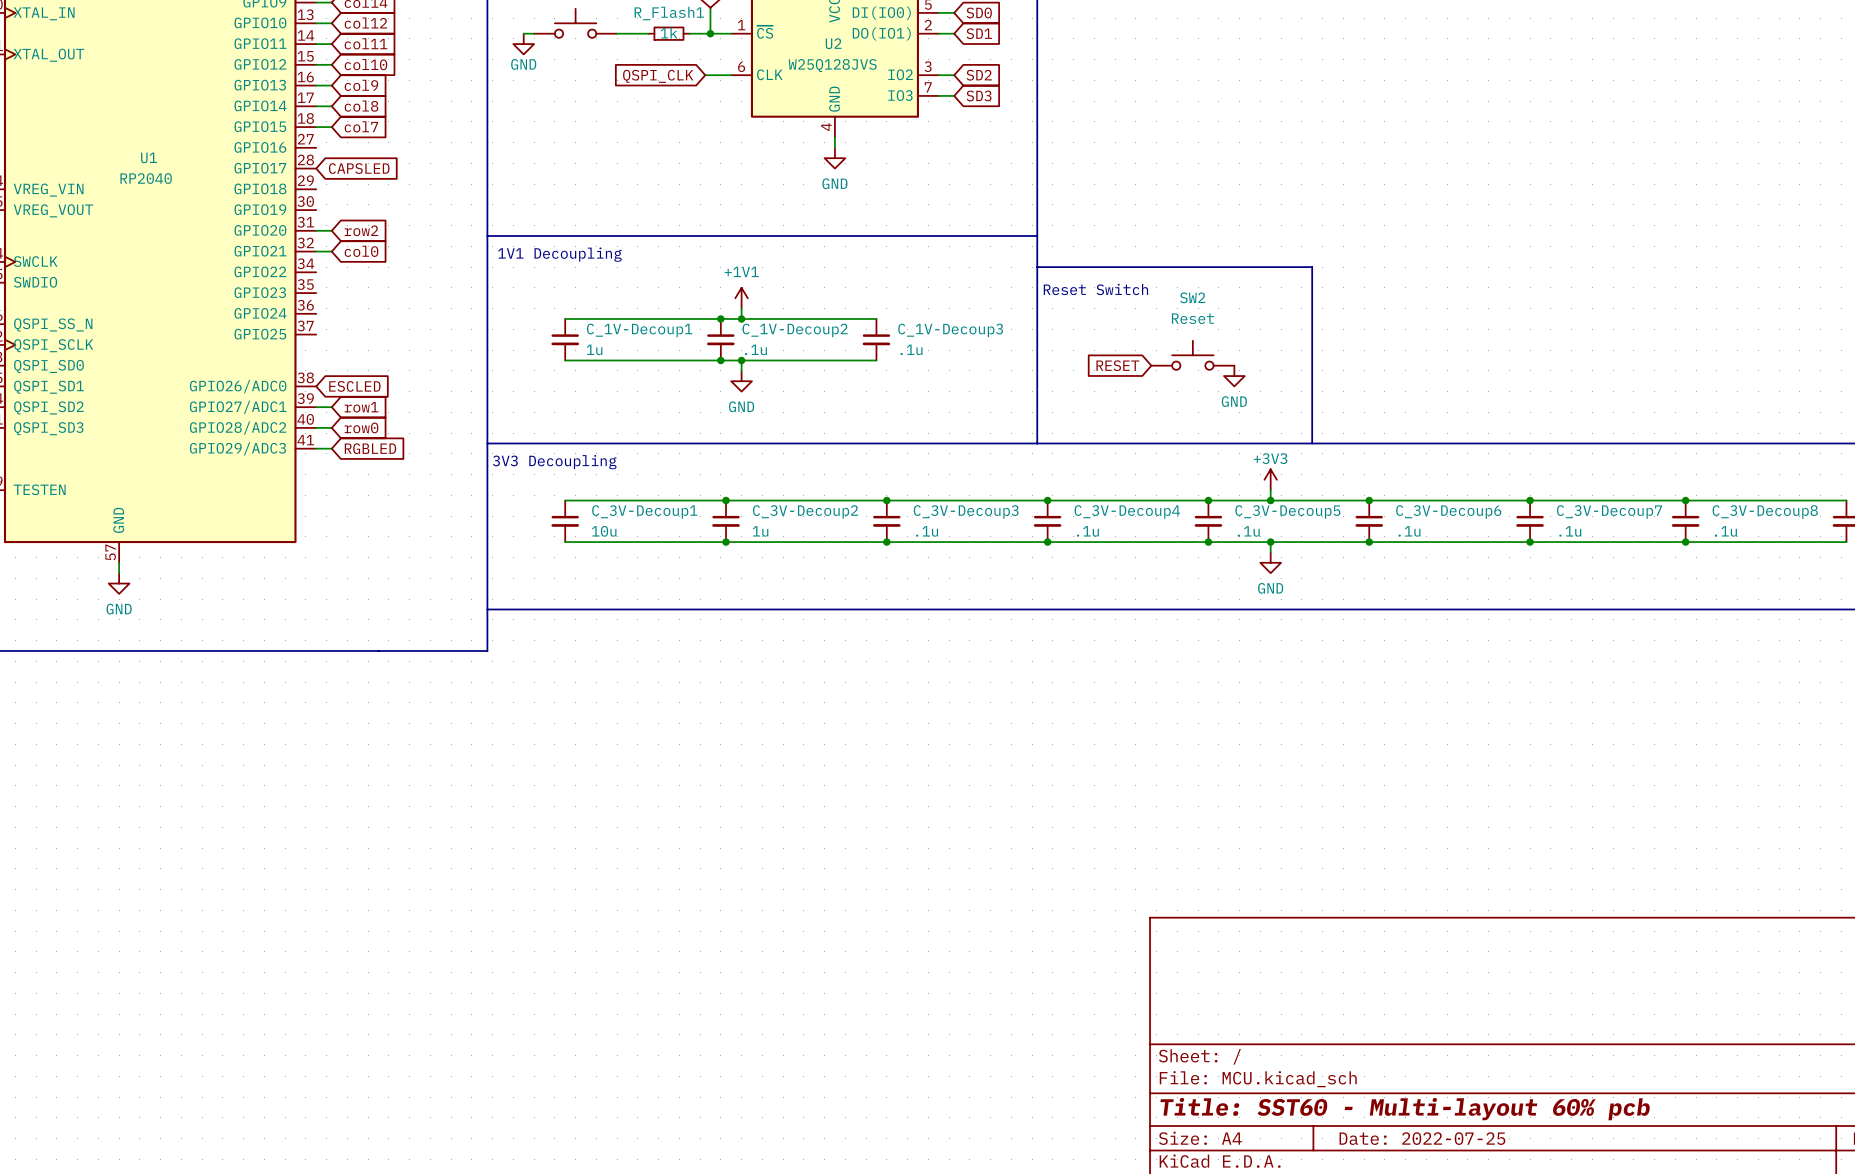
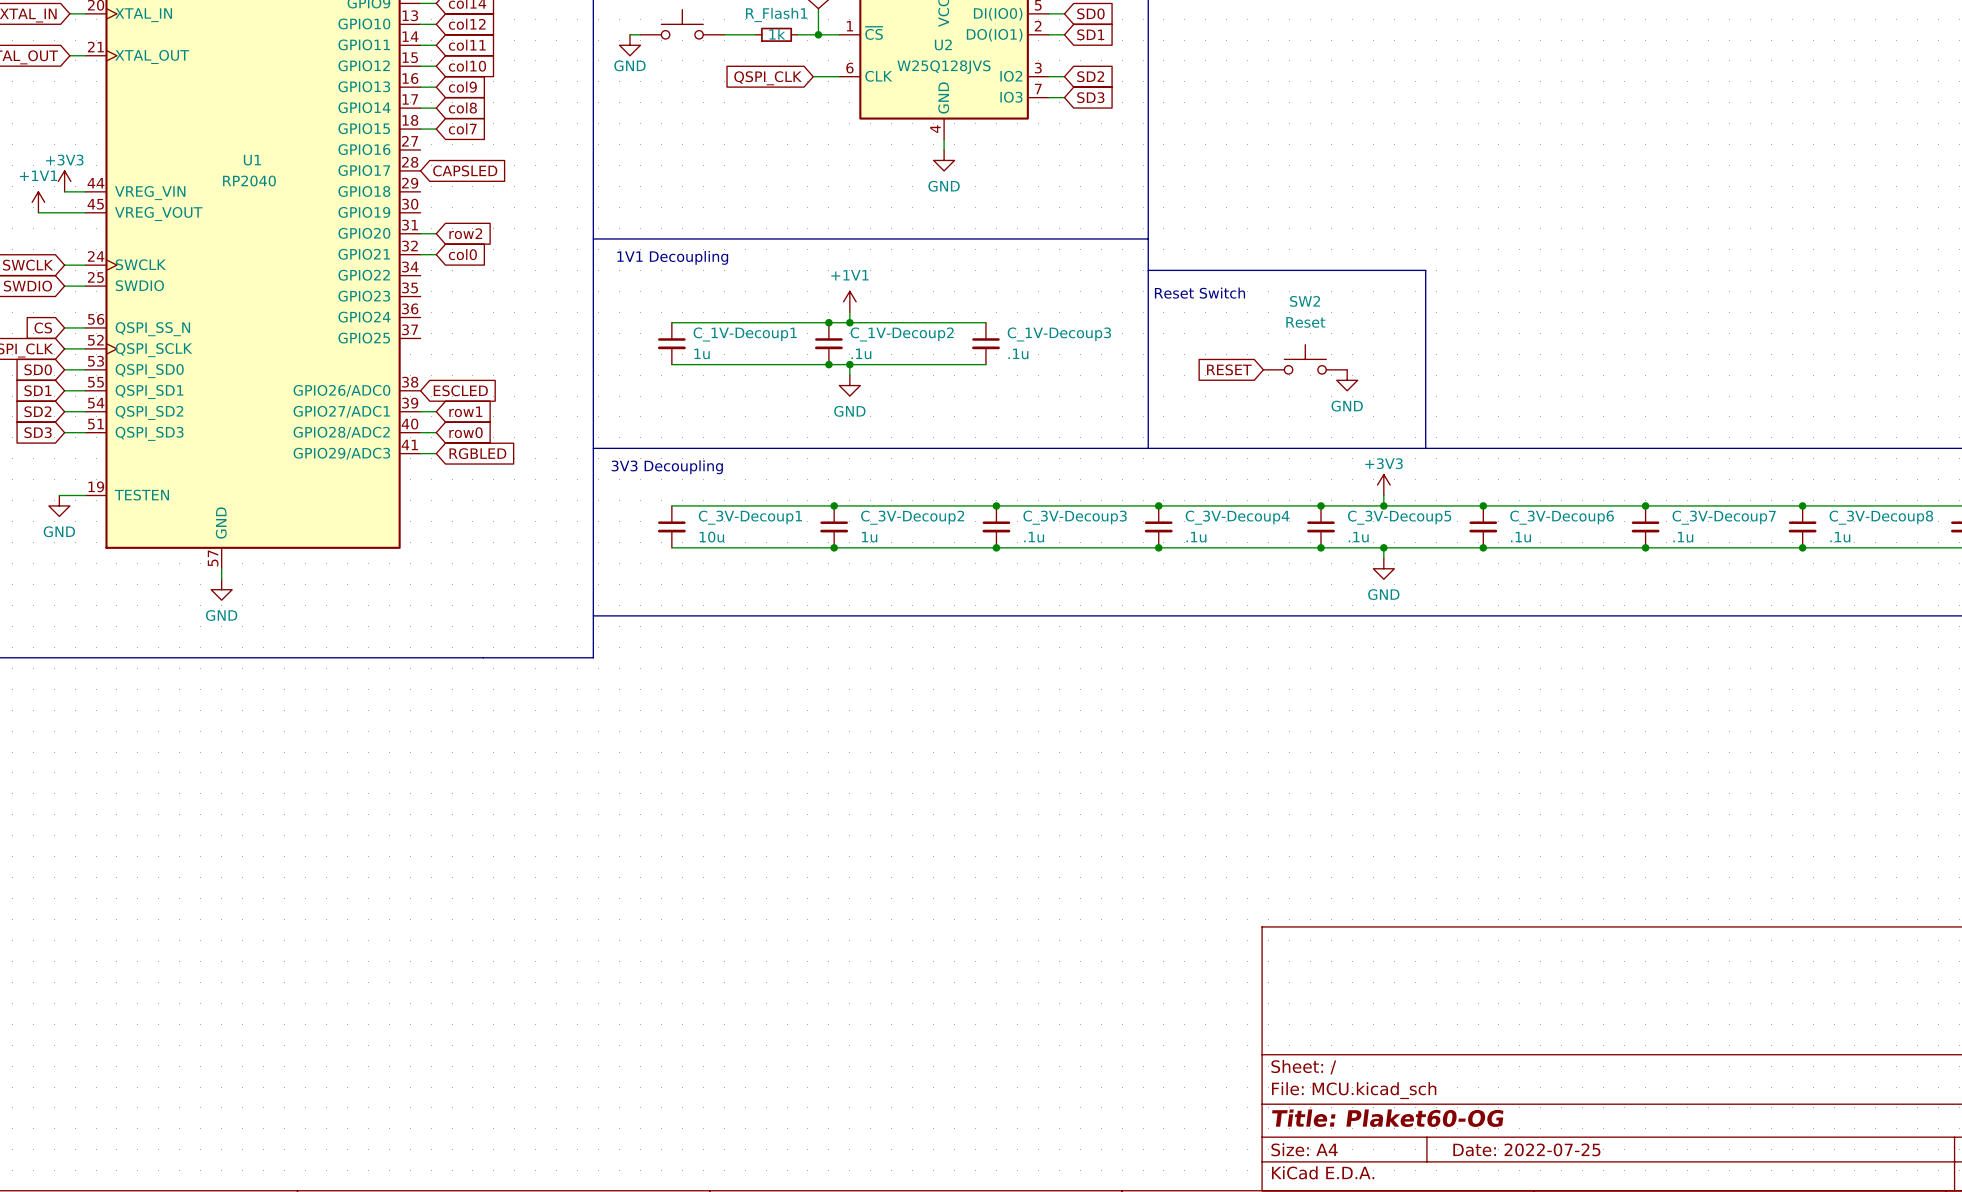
title block: Title: SST60 - Multi-layout 60% pcb (1405, 1109) -> Title: Plaket60-OG (1387, 1118)

